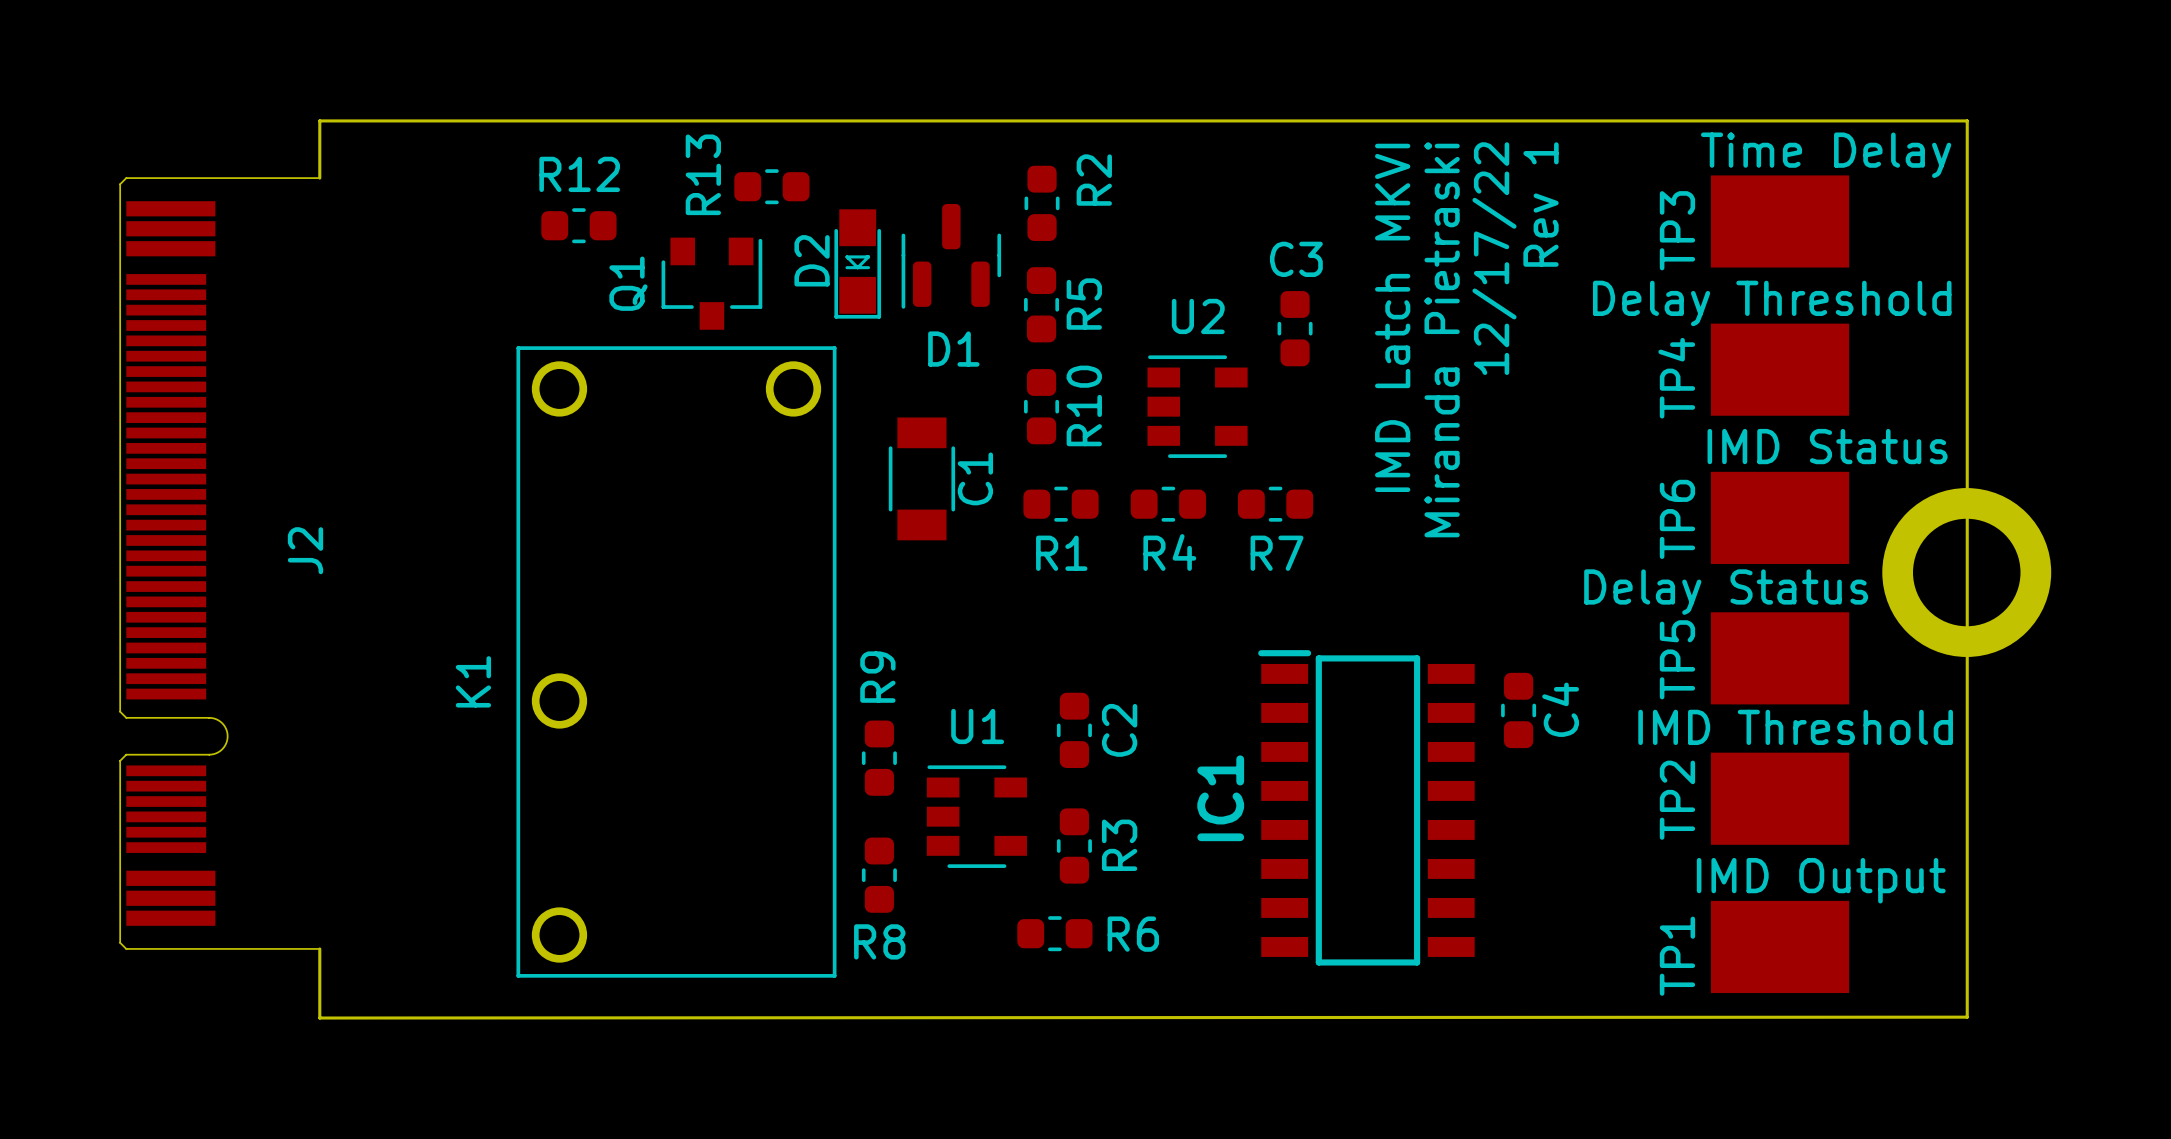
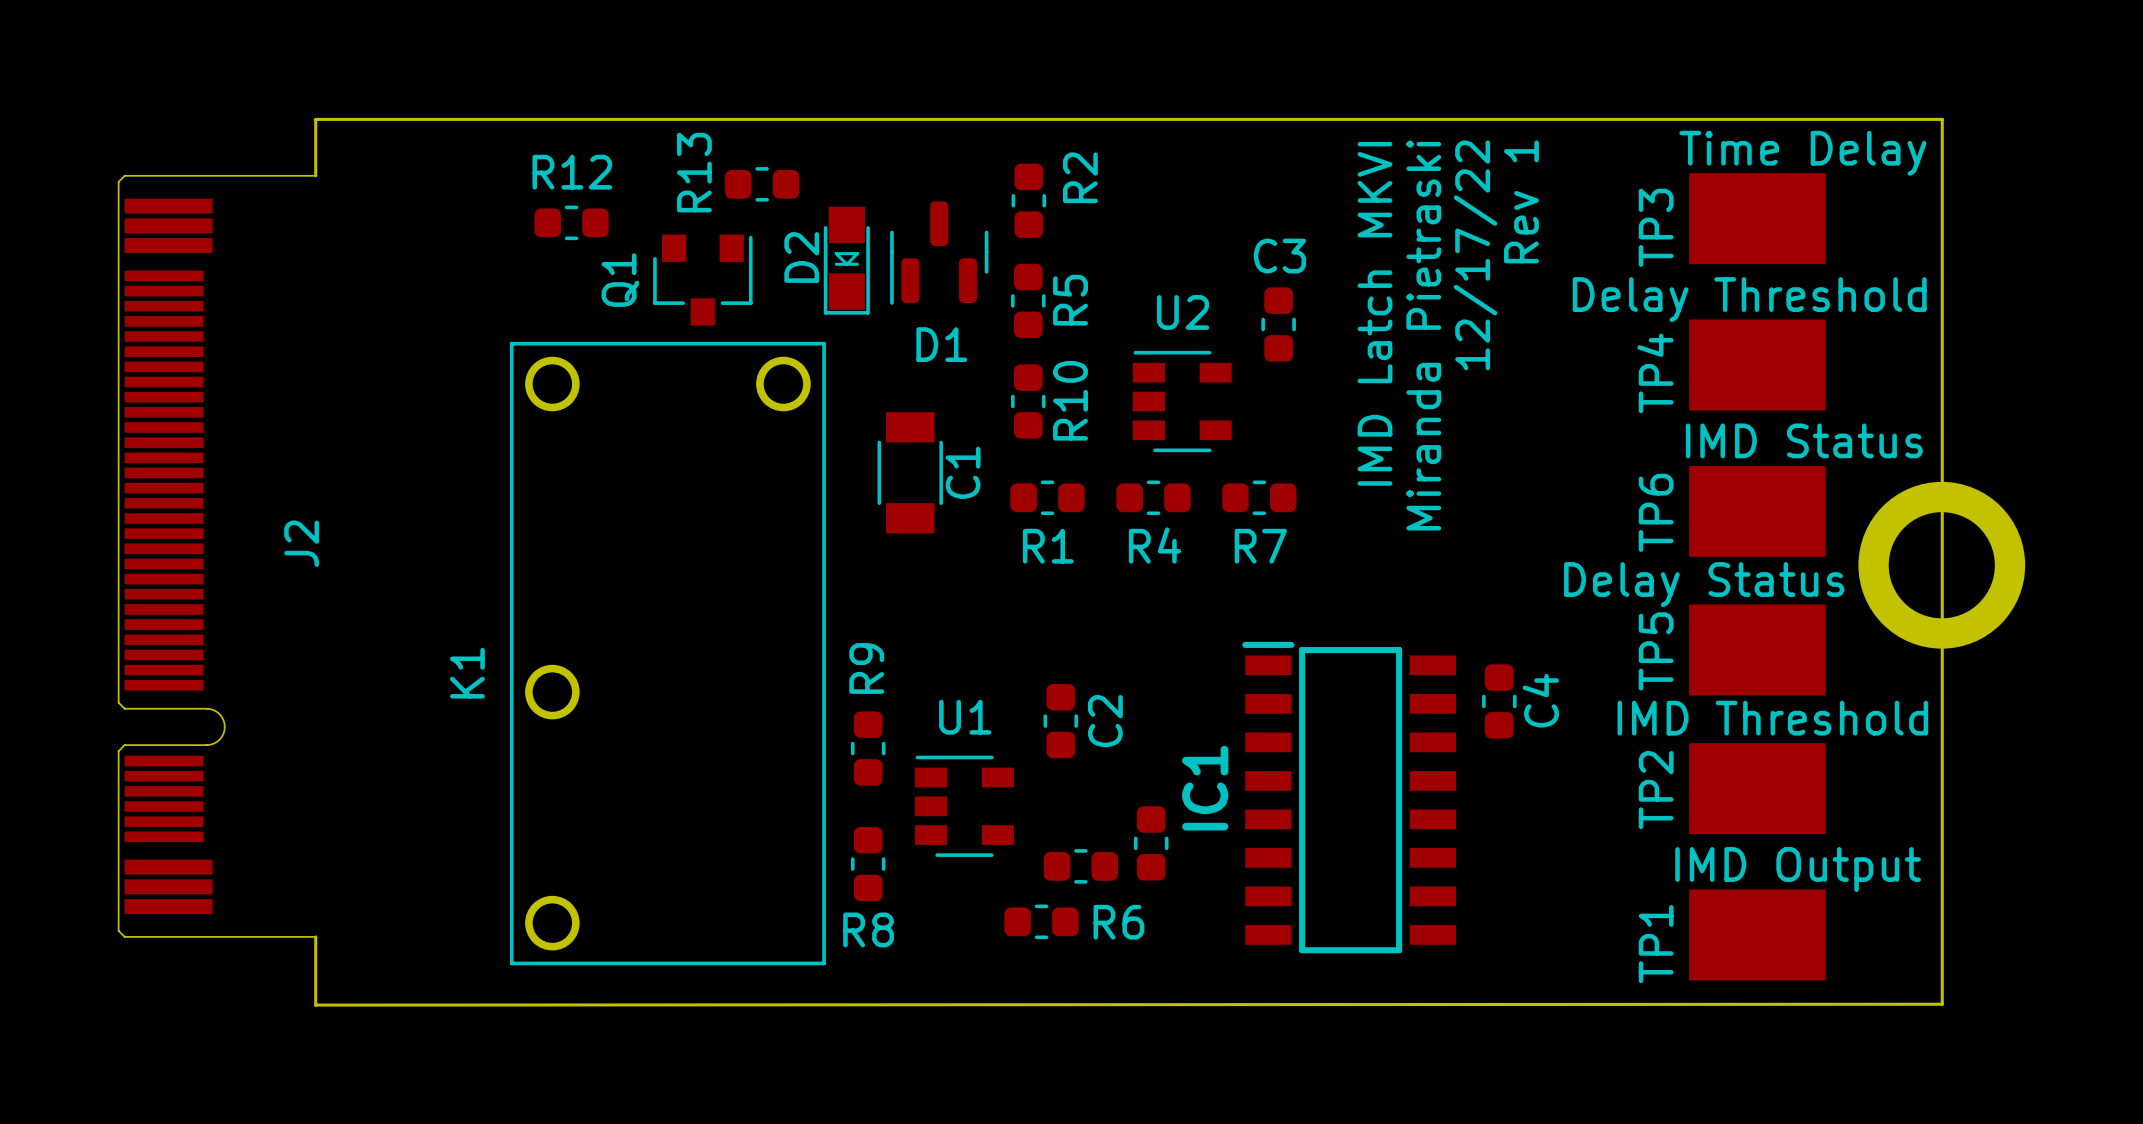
R3: (1074, 846) -> none
part: none -> (1151, 843)
part: none -> (1080, 866)

